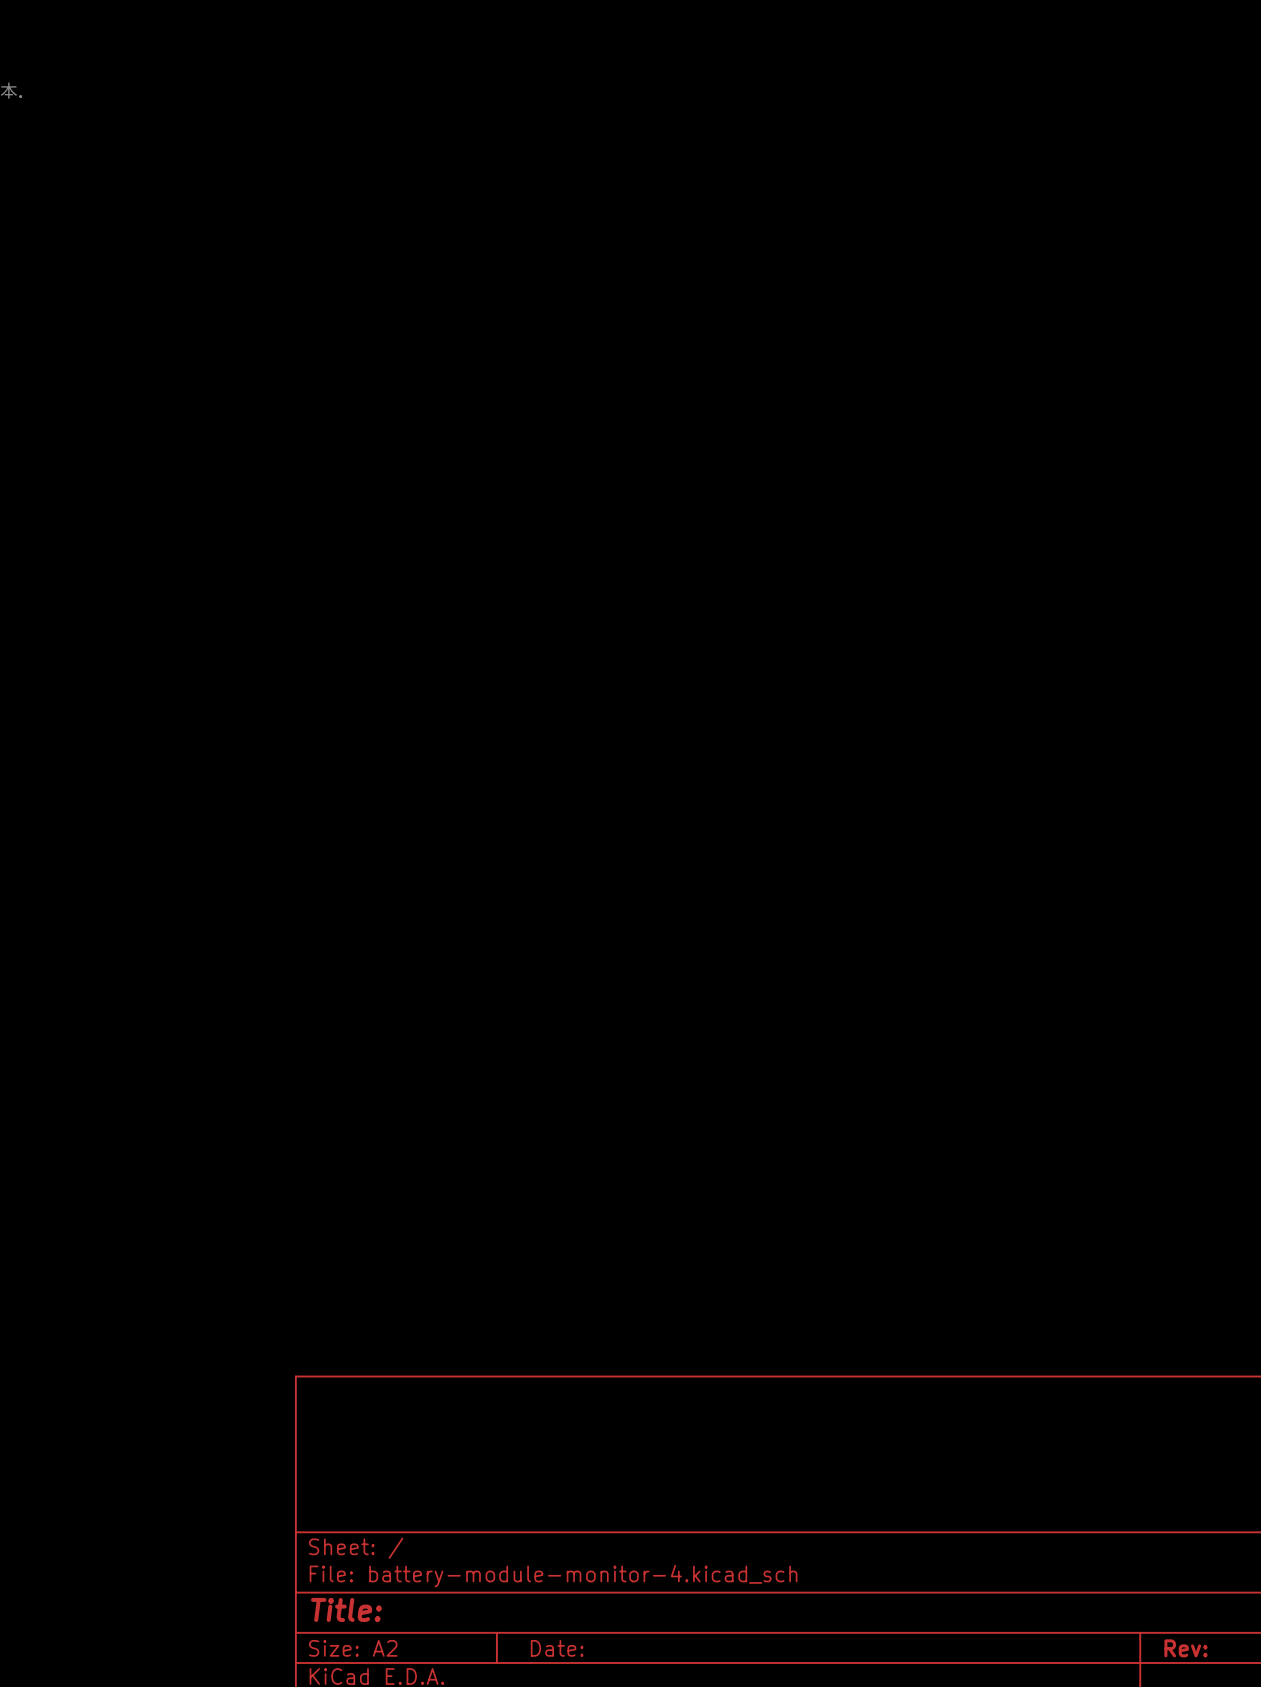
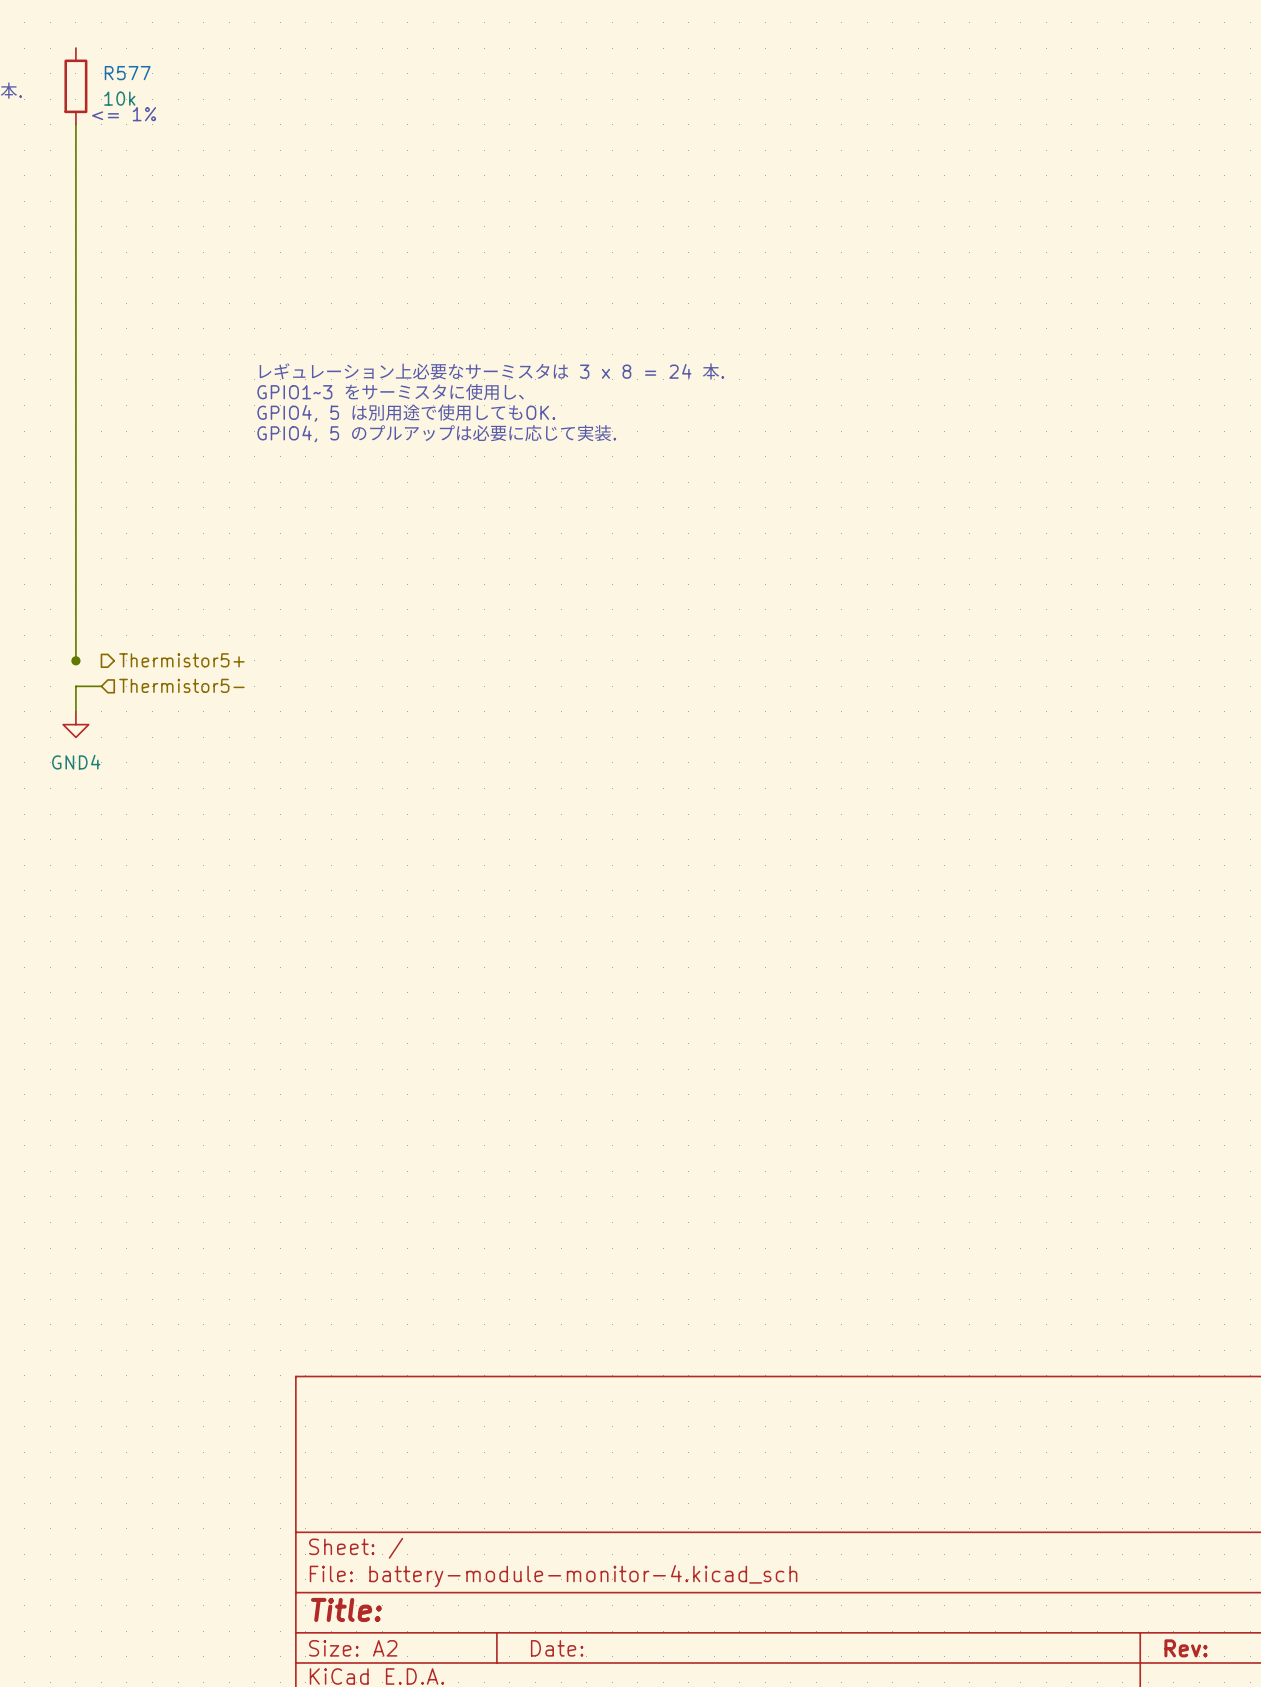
R577: none -> 10k (75, 86)
text: none -> <= 1% (124, 114)
wire: none -> (75, 124) (75, 660)
text: none -> レギュレーション上必要なサーミスタは 3 x 8 = 24 本. (491, 371)
text: none -> GPIO1~3 をサーミスタに使用し、 (391, 392)
text: none -> GPIO4, 5 は別用途で使用してもOK. (406, 412)
text: none -> GPIO4, 5 のプルアップは必要に応じて実装. (436, 433)
junction: none -> (75, 660)
hierarchical label: none -> Thermistor5+ (181, 660)
hierarchical label: none -> Thermistor5- (181, 685)
wire: none -> (101, 686) (75, 686) (75, 711)
power symbol: none -> GND4 (75, 724)

